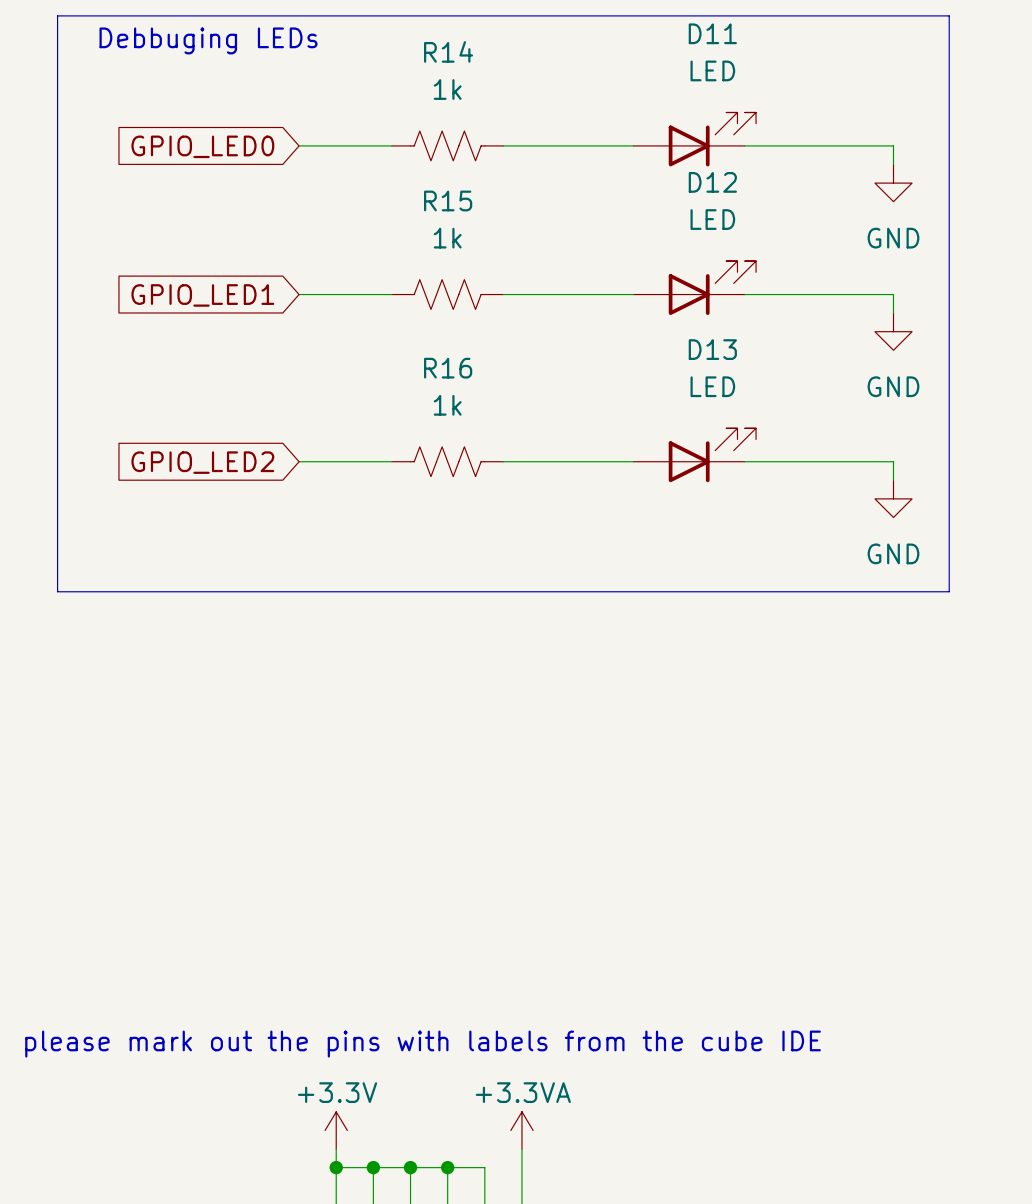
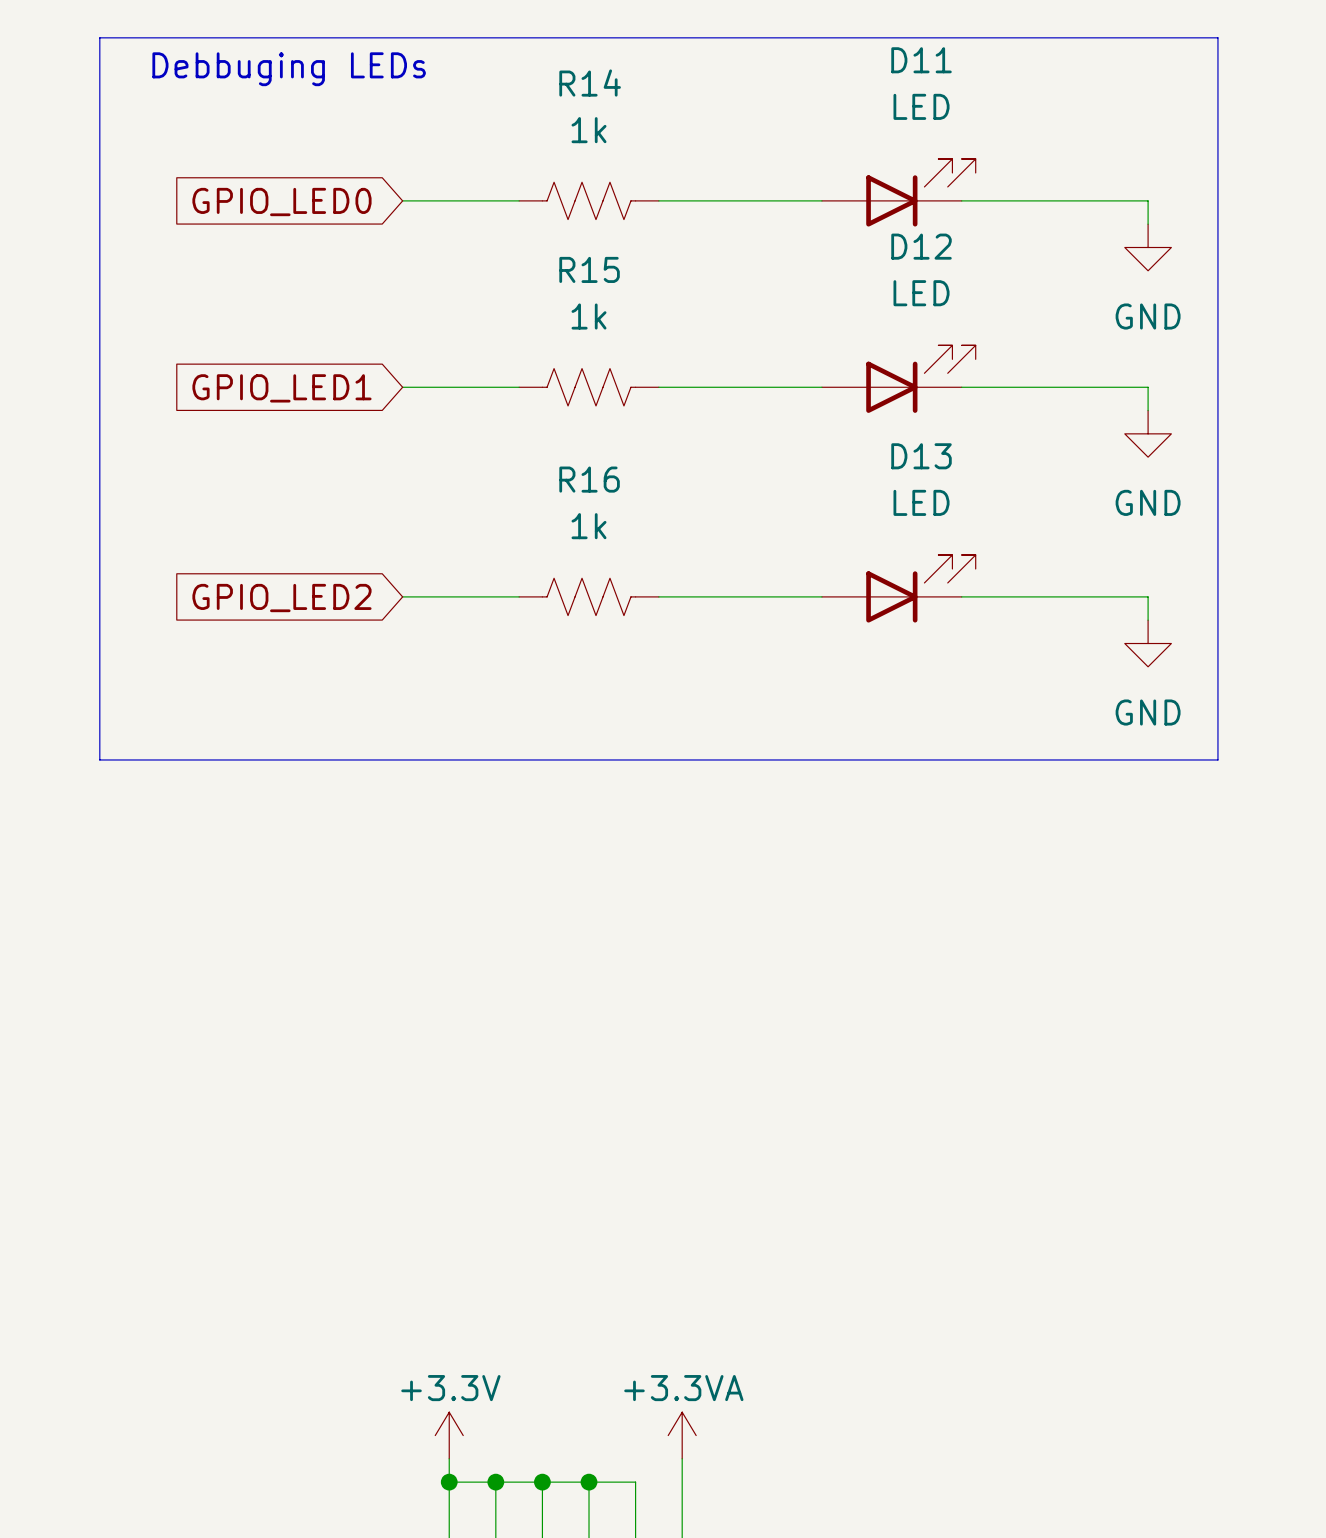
text: please mark out the pins with labels from the cube IDE (423, 1044) -> none

